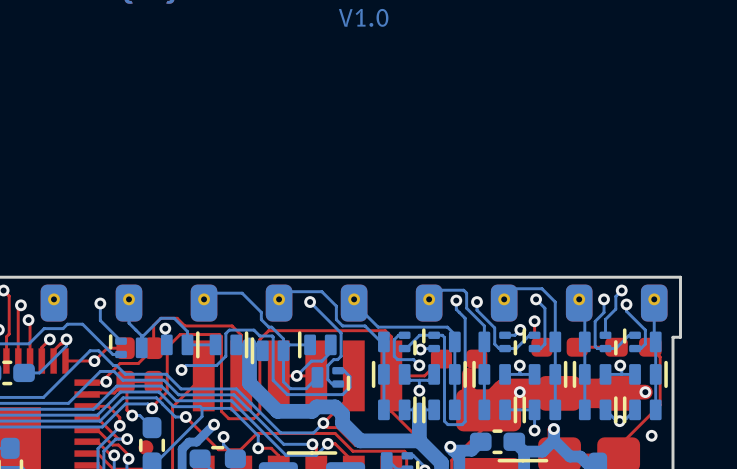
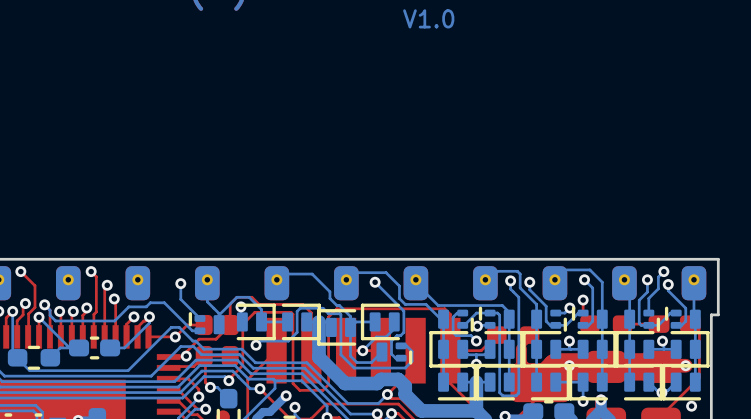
part footprint: [160, 331, 200, 359] -> [236, 303, 276, 341]
part footprint: [209, 331, 249, 359] -> [281, 303, 321, 341]
part footprint: [297, 331, 337, 359] -> [360, 303, 401, 341]
part footprint: [250, 337, 290, 365] -> [317, 309, 357, 346]
part footprint: [371, 360, 411, 389] -> [429, 330, 469, 368]
part footprint: [428, 360, 467, 389] -> [484, 330, 524, 368]
part footprint: [472, 360, 511, 389] -> [522, 330, 562, 368]
part footprint: [528, 360, 568, 389] -> [577, 330, 617, 368]
part footprint: [572, 360, 612, 389] -> [615, 330, 655, 368]
part footprint: [629, 360, 668, 389] -> [670, 330, 710, 368]
part footprint: [378, 396, 417, 424] -> [437, 363, 477, 401]
part footprint: [422, 396, 461, 424] -> [475, 363, 515, 401]
part footprint: [478, 396, 518, 424] -> [530, 363, 570, 401]
part footprint: [522, 396, 562, 424] -> [568, 363, 609, 401]
part footprint: [578, 396, 618, 424] -> [623, 363, 664, 401]
part footprint: [622, 396, 662, 424] -> [661, 363, 702, 401]

